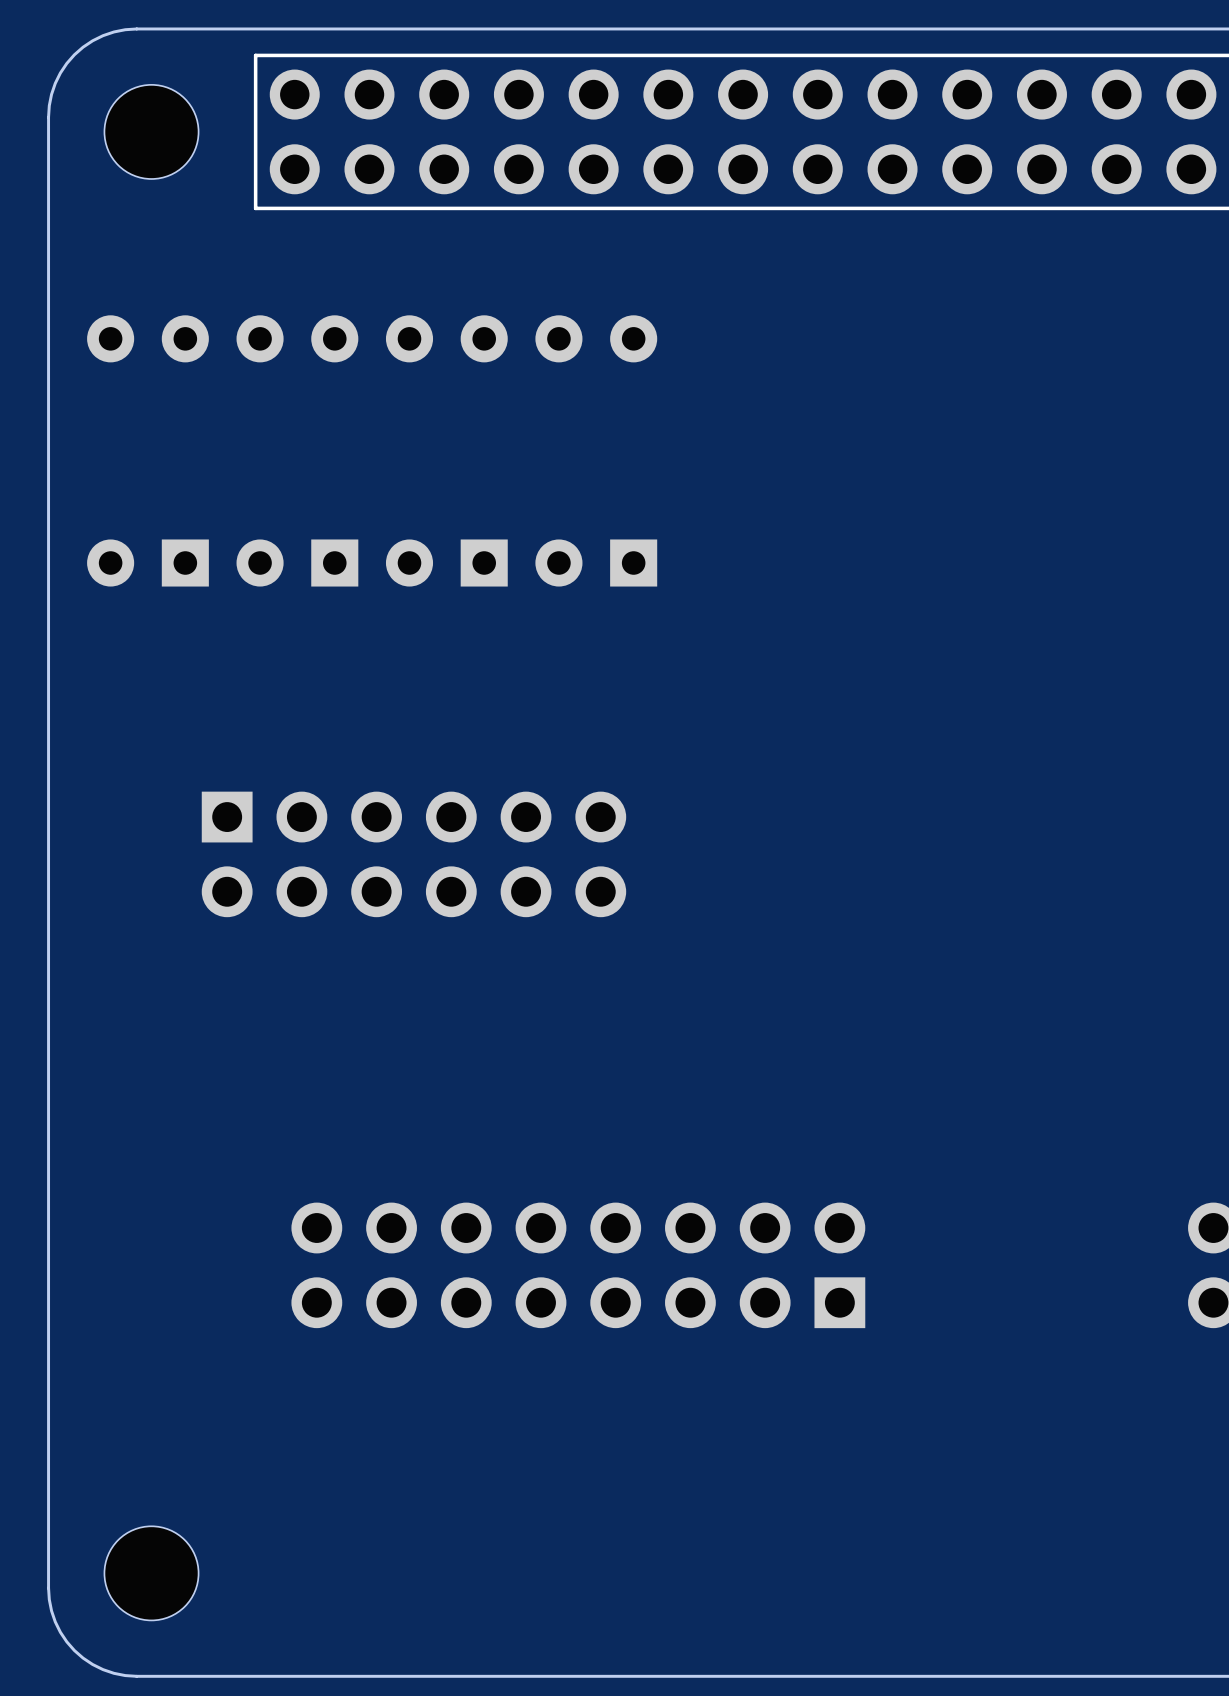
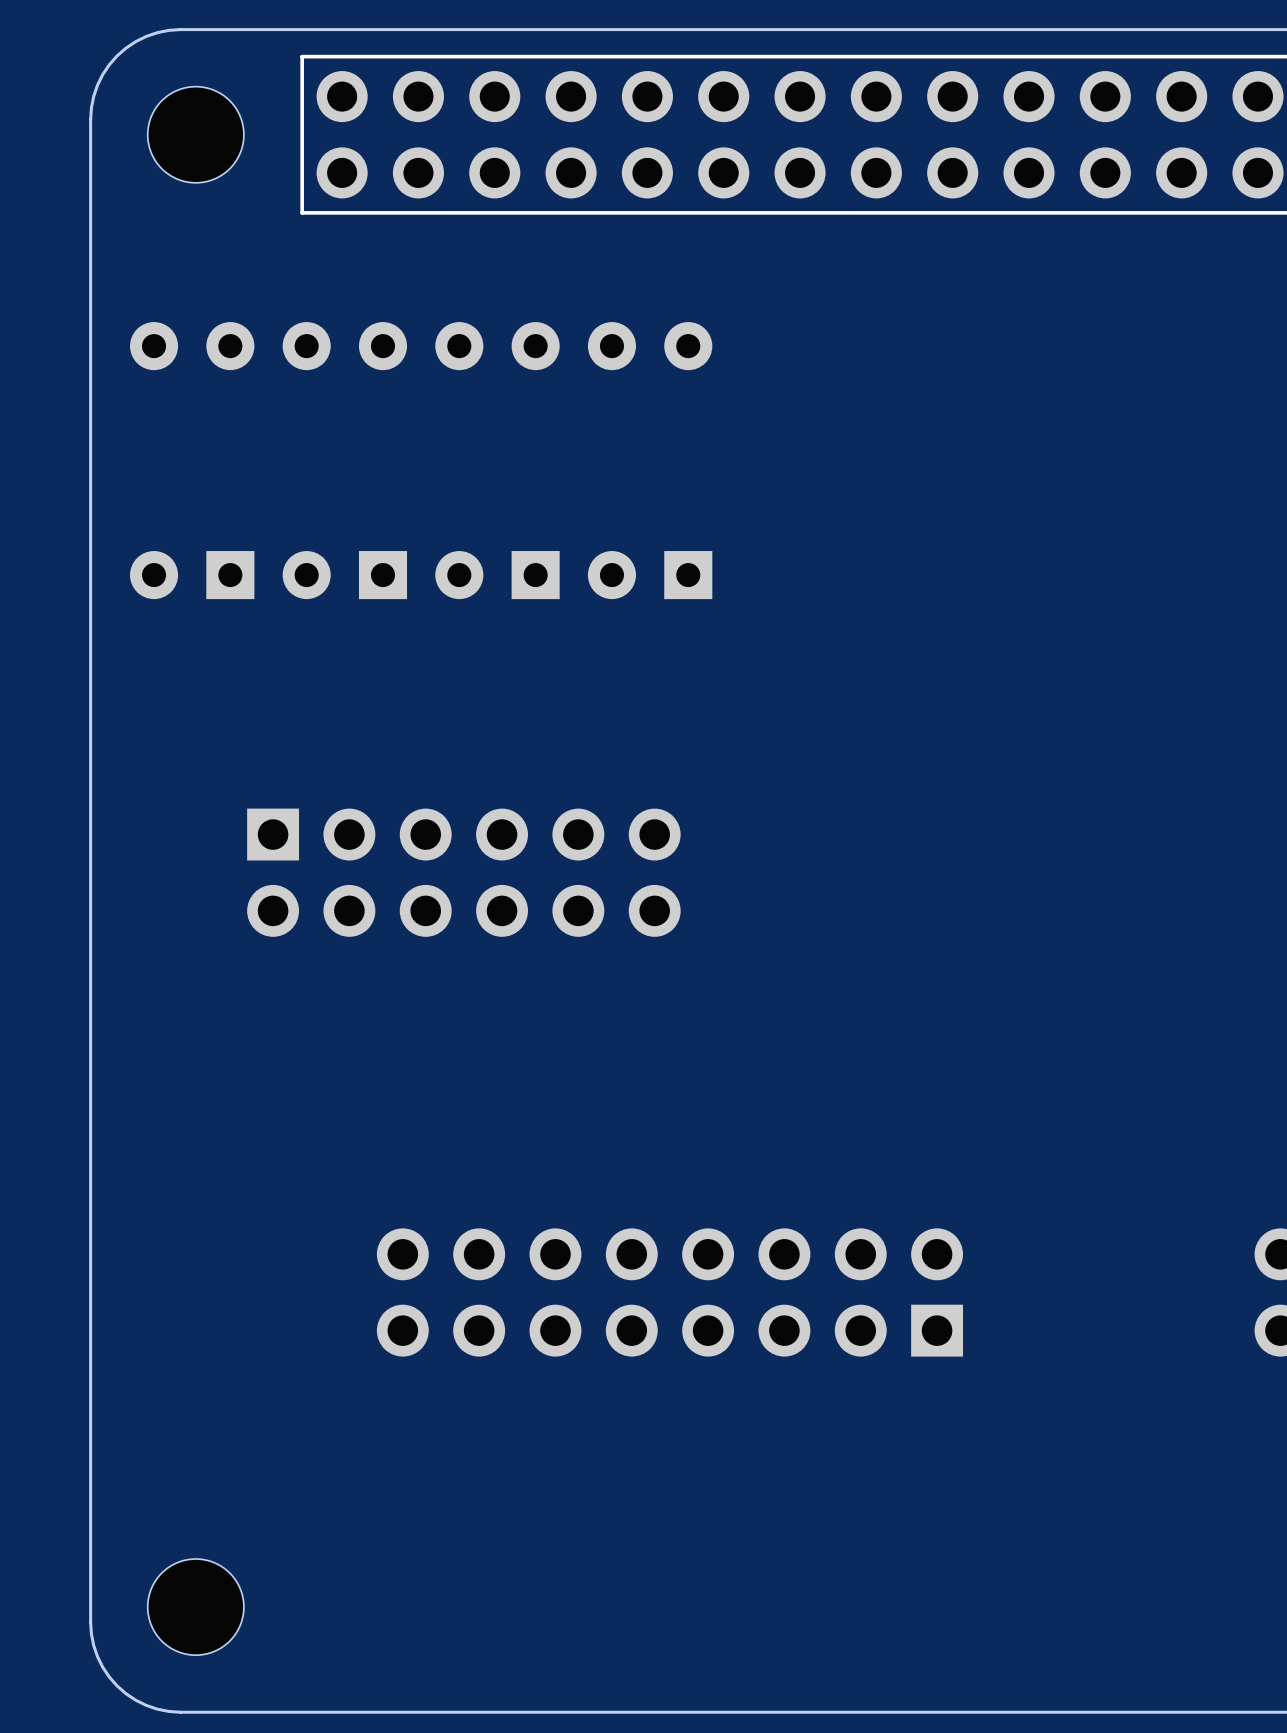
part position: (578, 1265) -> (669, 1292)

